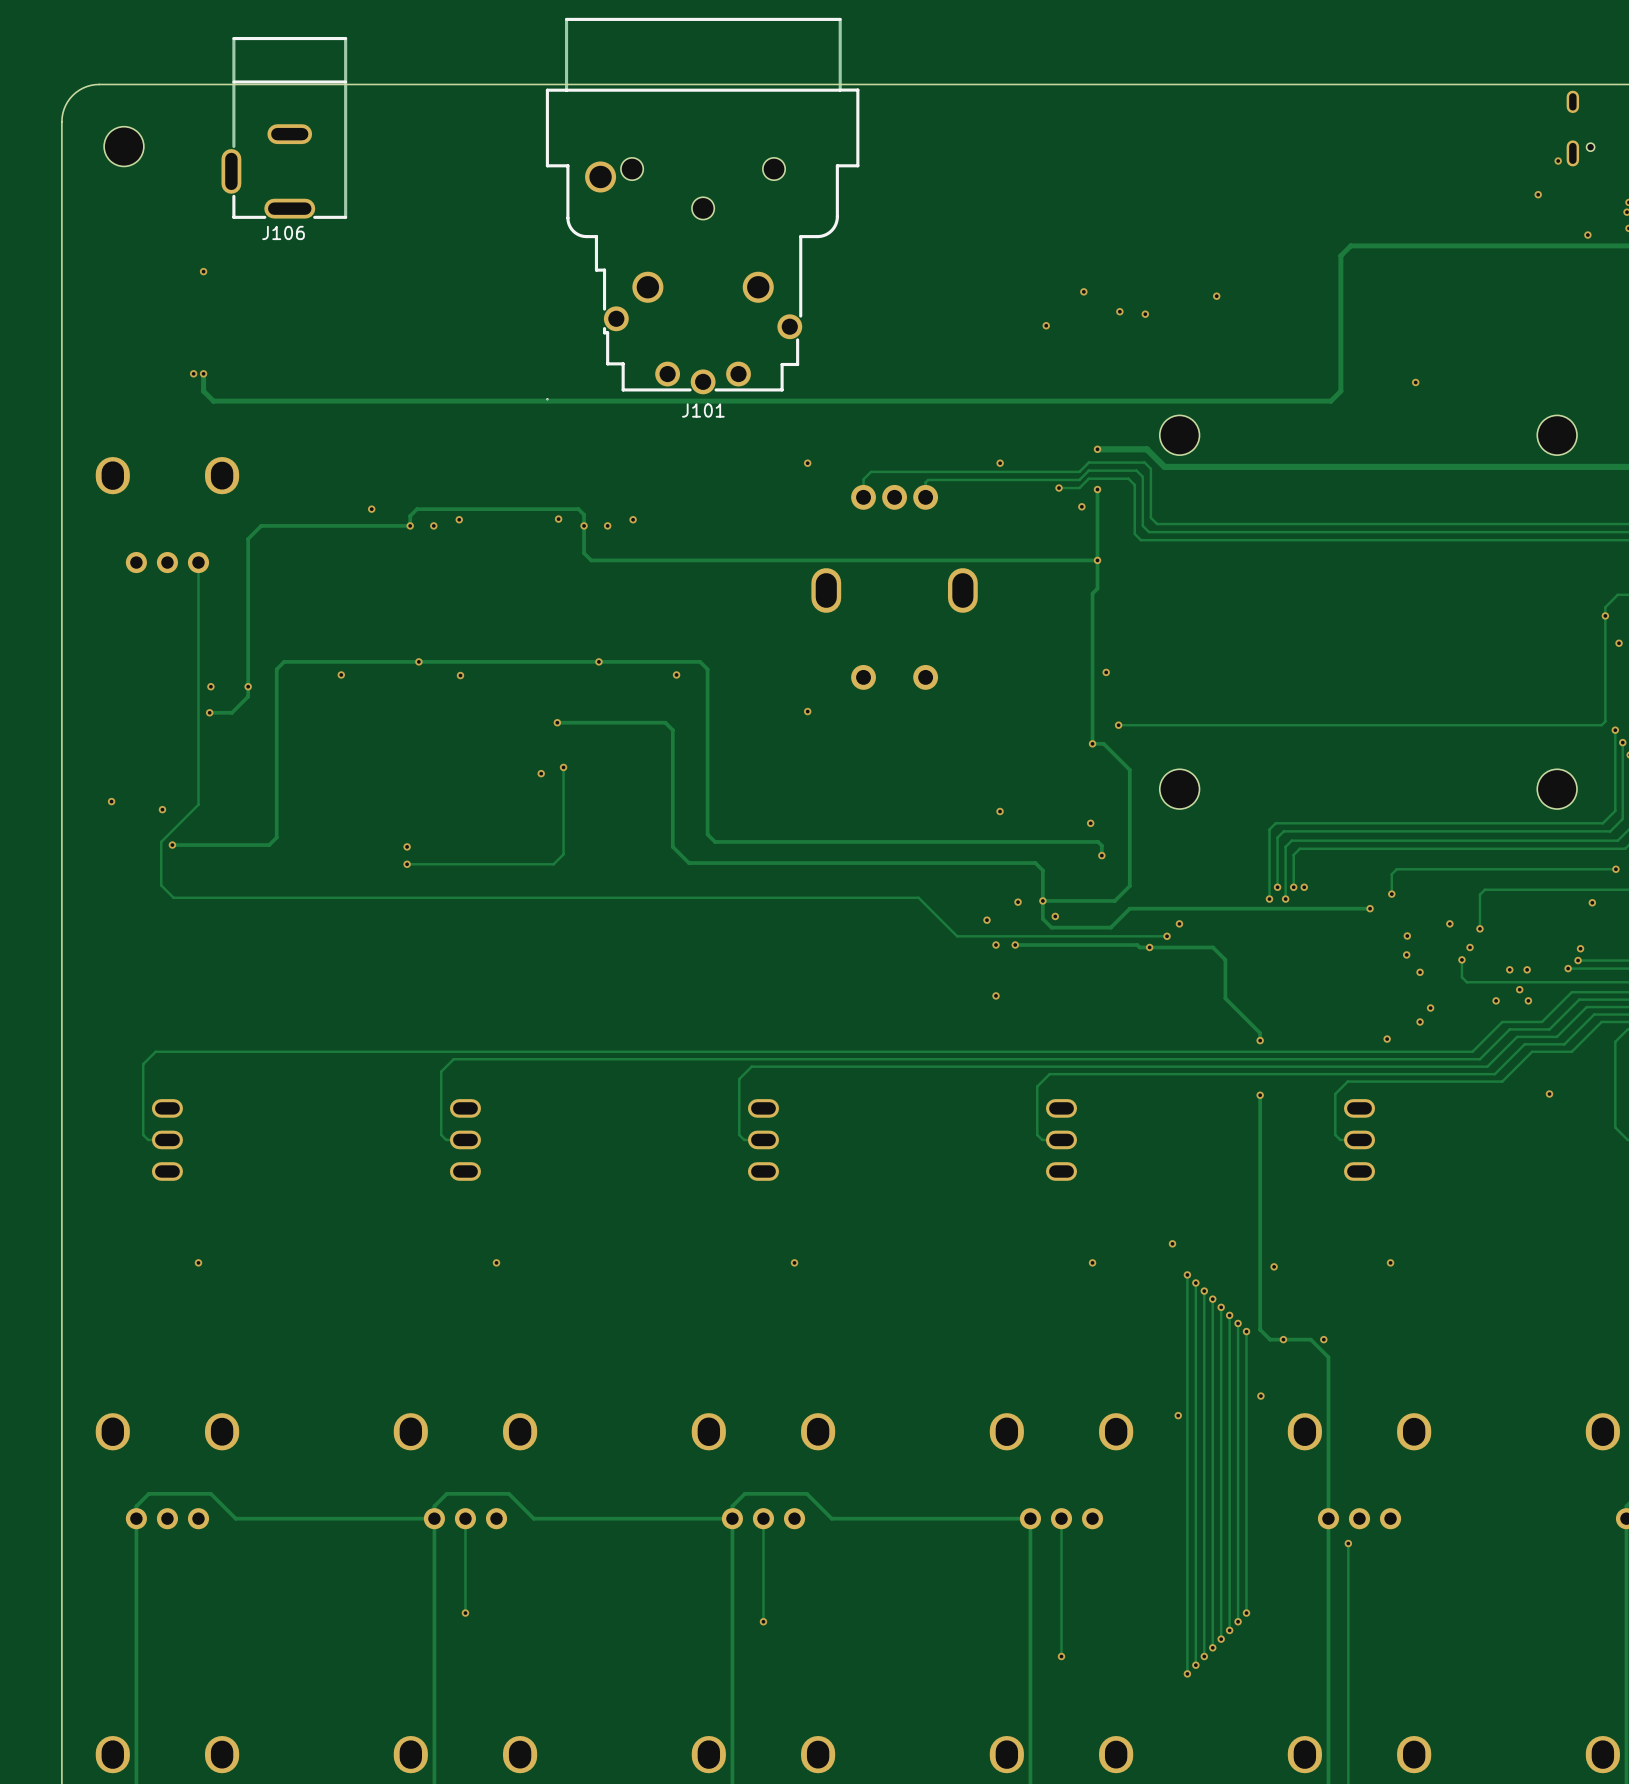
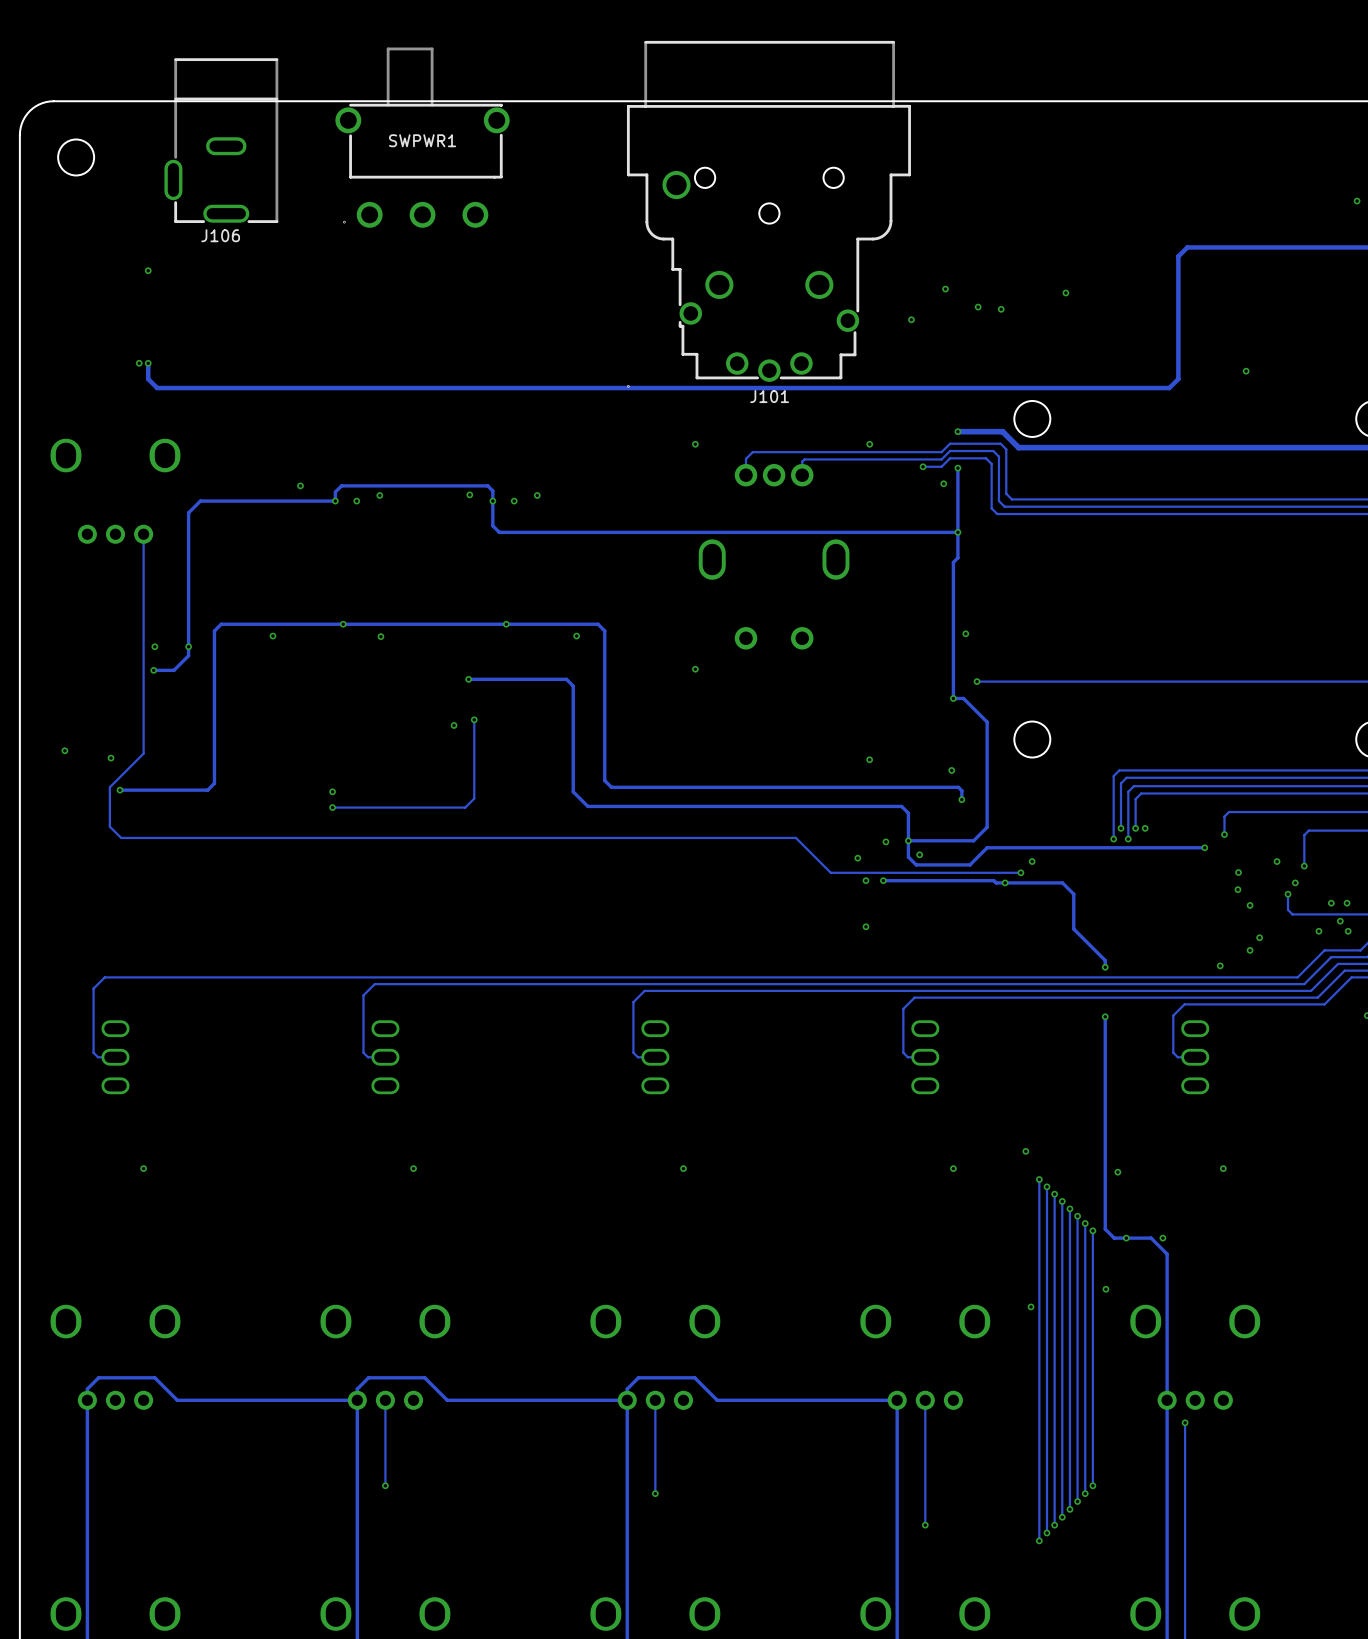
SWPWR1: none -> (422, 137)
J101 position: (702, 208) -> (768, 213)

